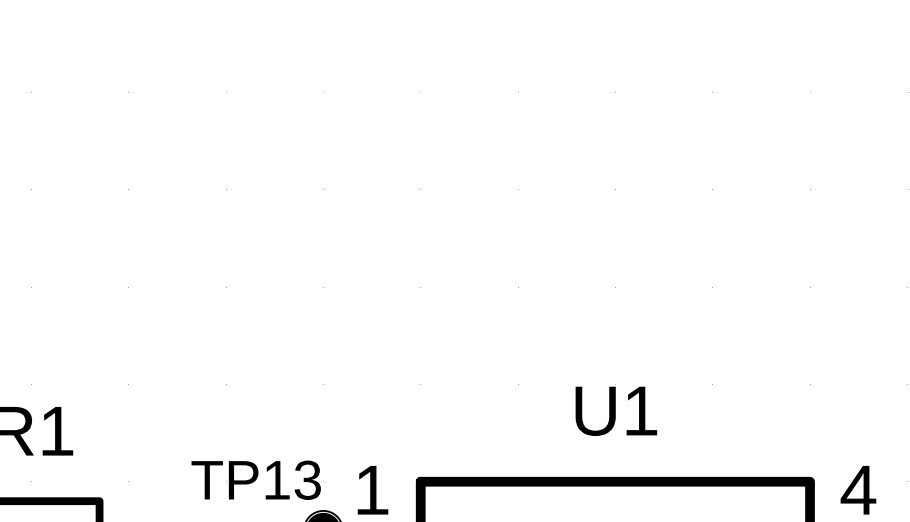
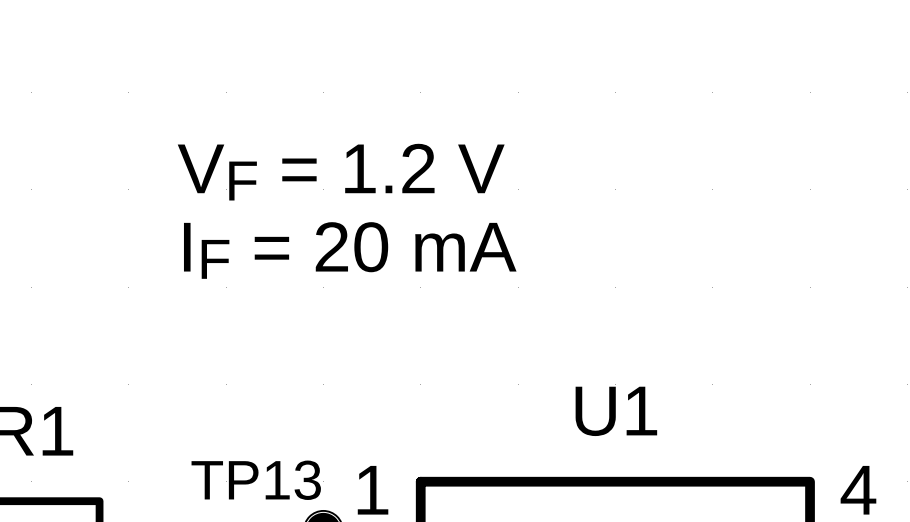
text: none -> VF = 1.2 V (341, 172)
text: none -> IF = 20 mA (350, 250)

